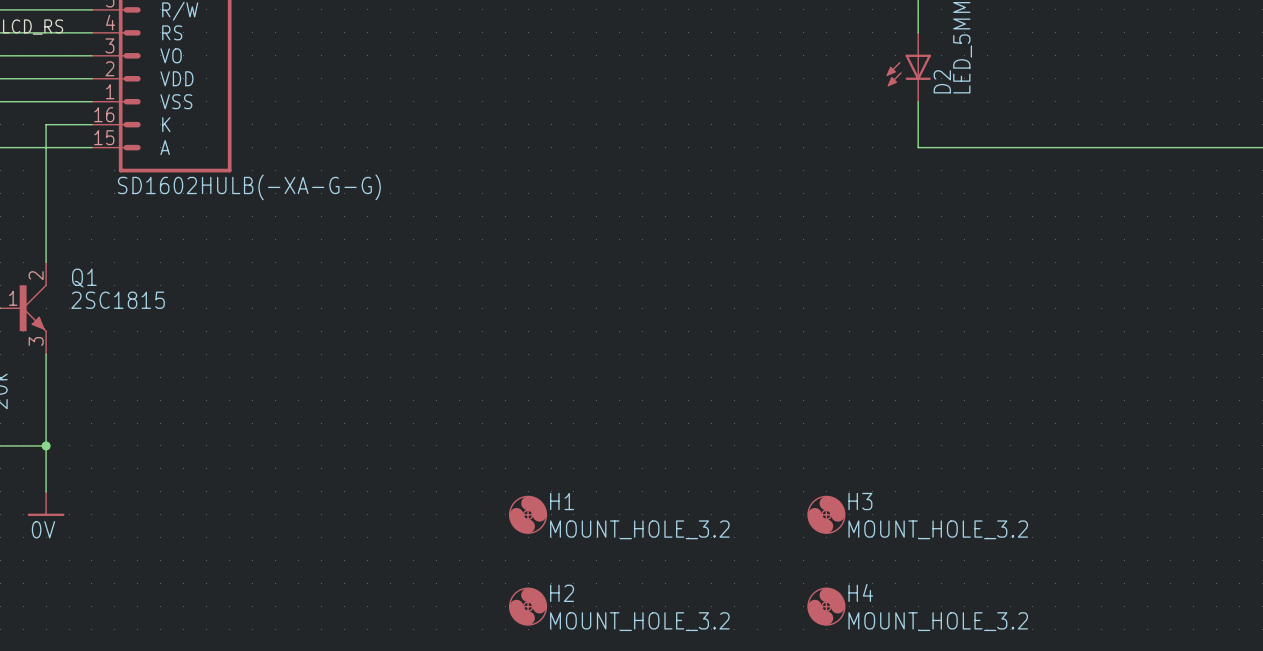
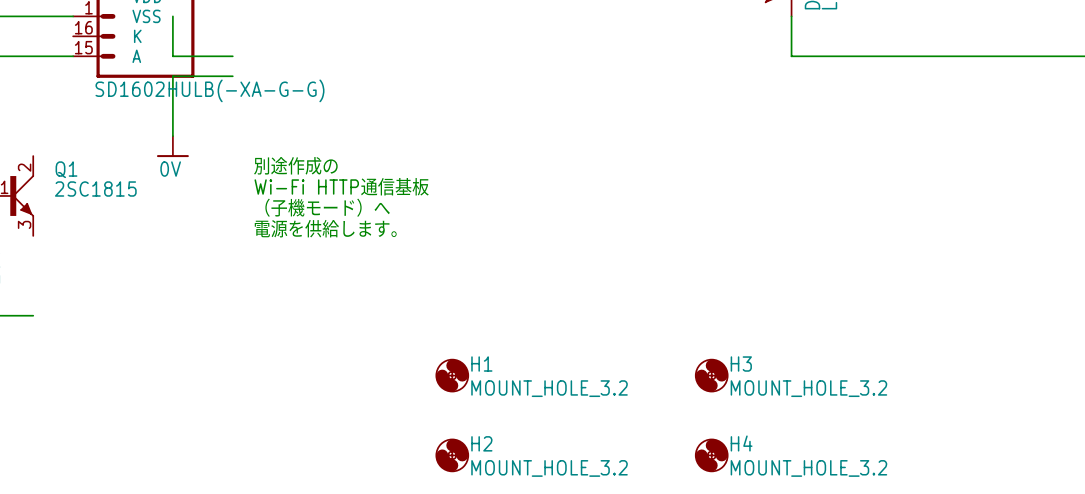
wire: none -> (172, 16) (172, 56) (232, 56)
wire: (91, 124) (46, 124) (46, 262) -> none
wire: none -> (232, 76) (172, 76) (172, 136)
power symbol: none -> 0V (172, 146)
text: none -> 別途作成の (295, 165)
text: none -> Wi-Fi HTTP通信基板 (342, 186)
text: none -> （子機モード）へ (327, 207)
text: none -> 電源を供給します。 (325, 228)
wire: (46, 354) (46, 491) -> none
junction: (46, 445) -> none
power symbol: 0V (46, 503) -> none

